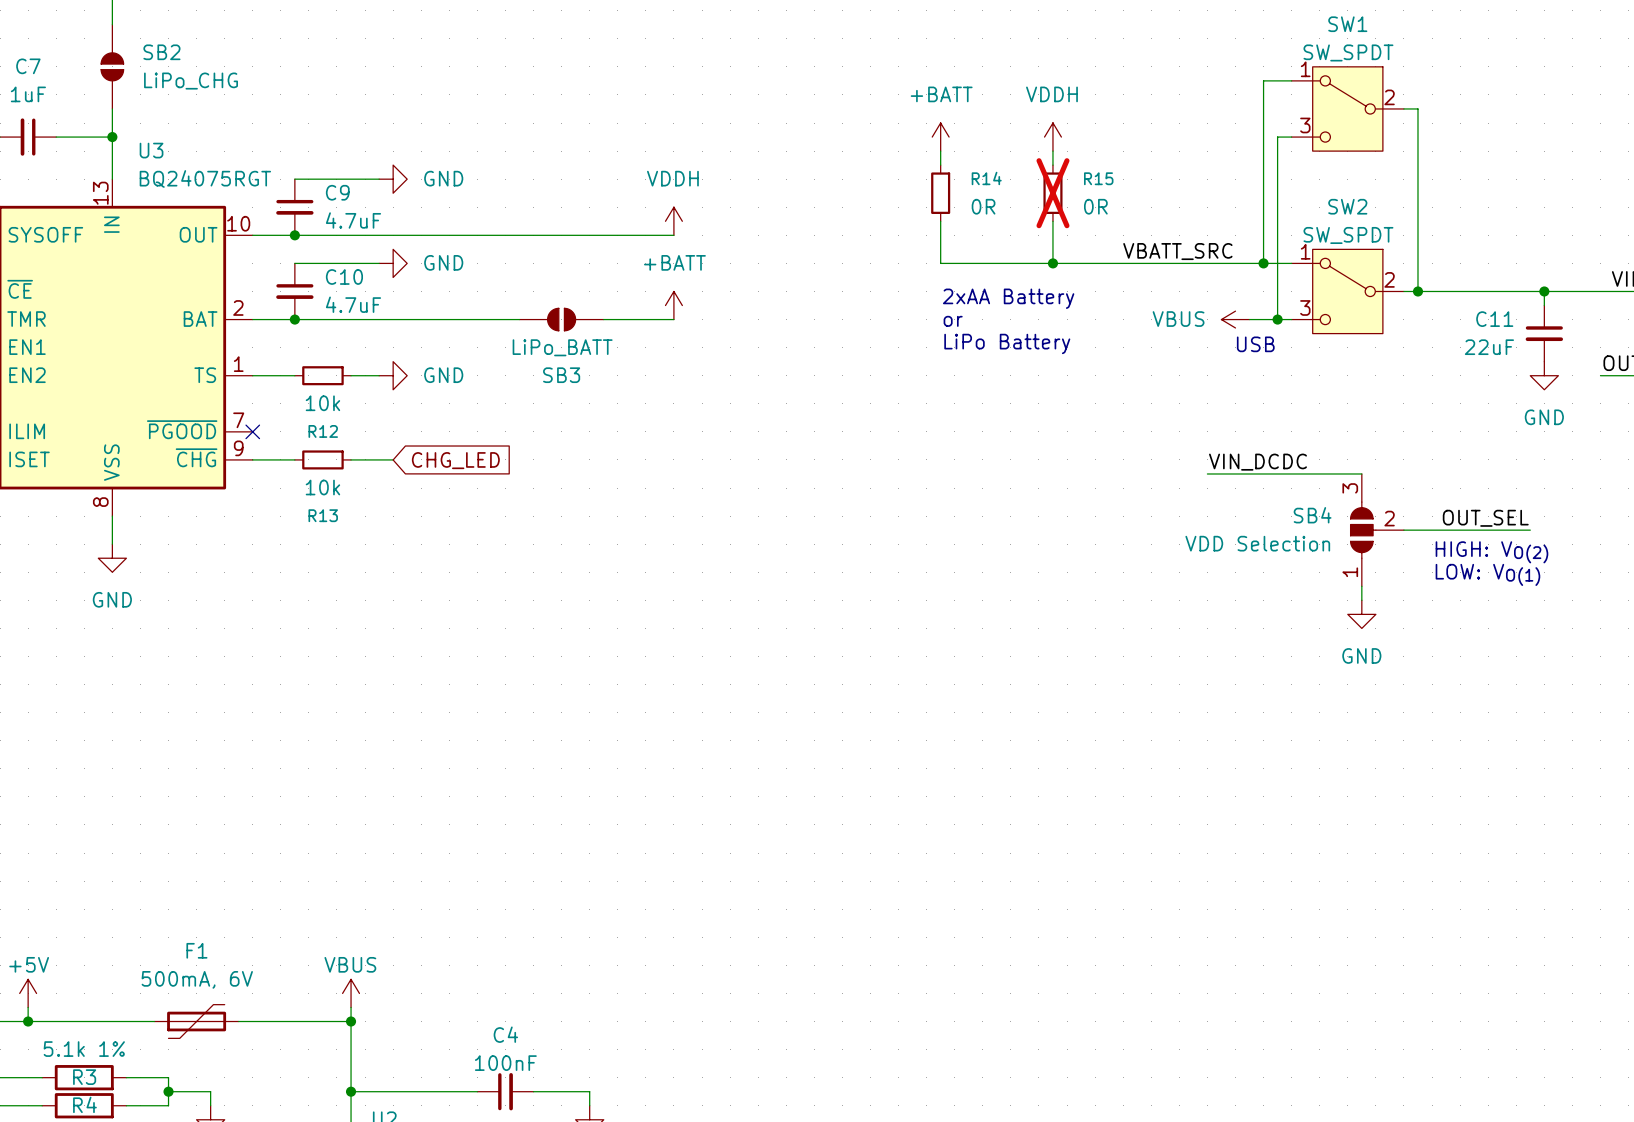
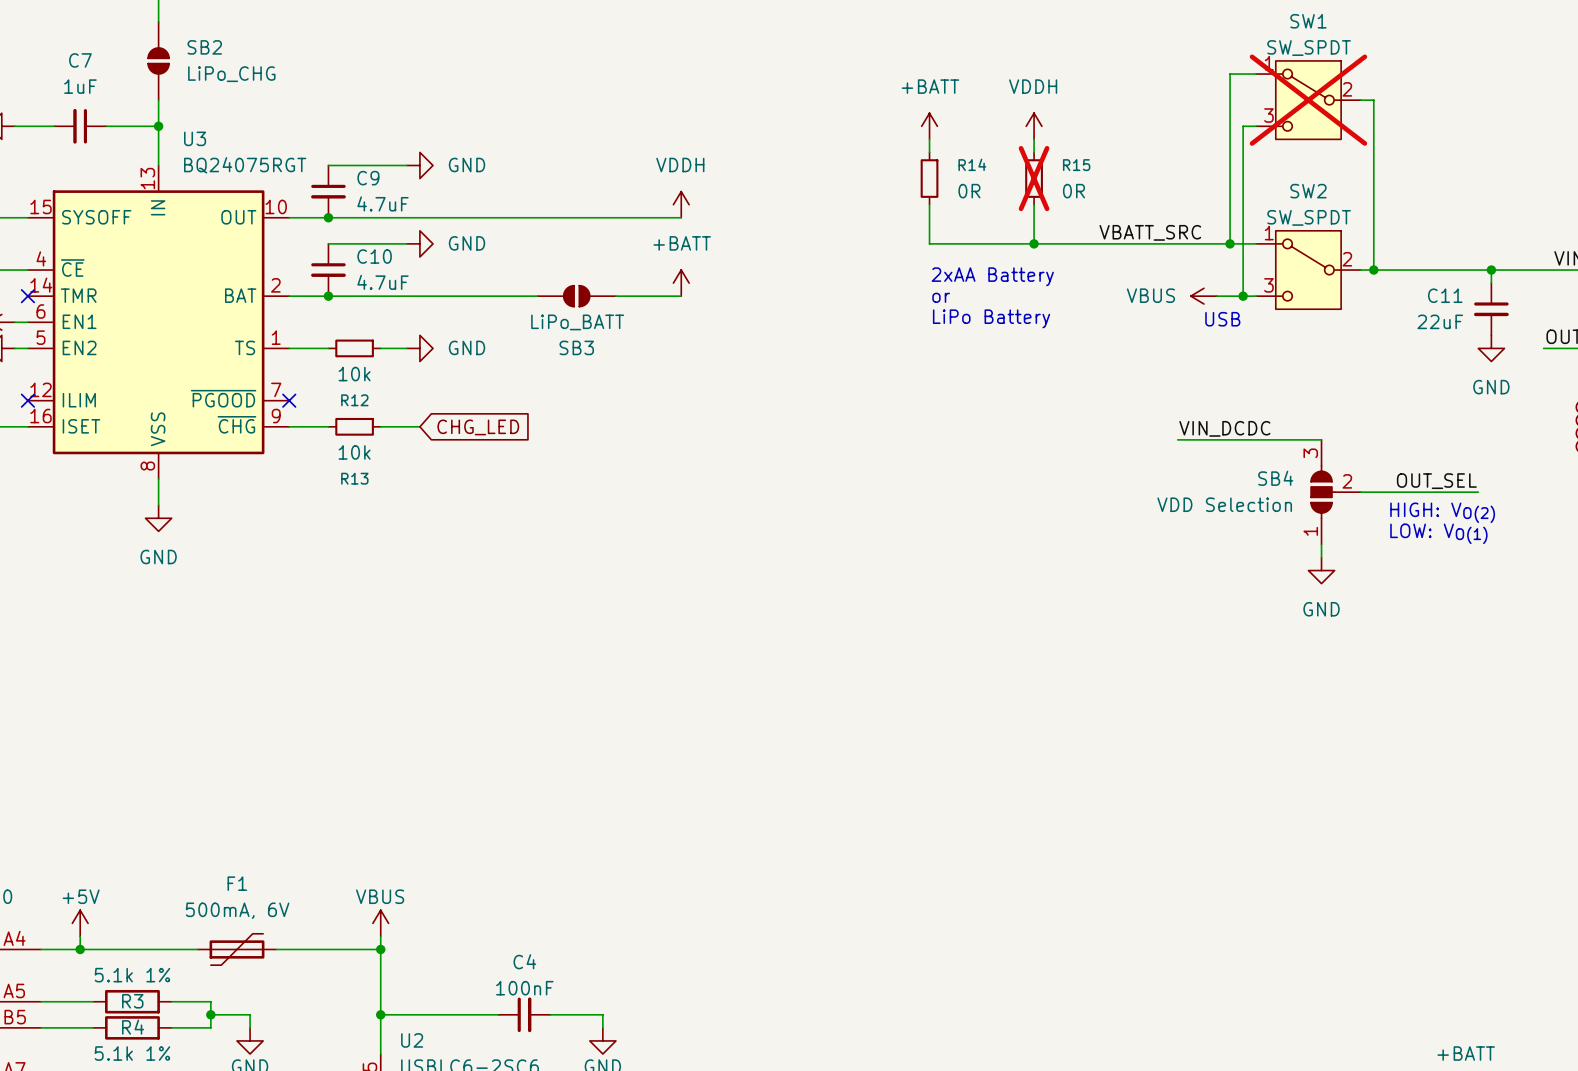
SW1 do-not-place cross: none -> (1308, 100)

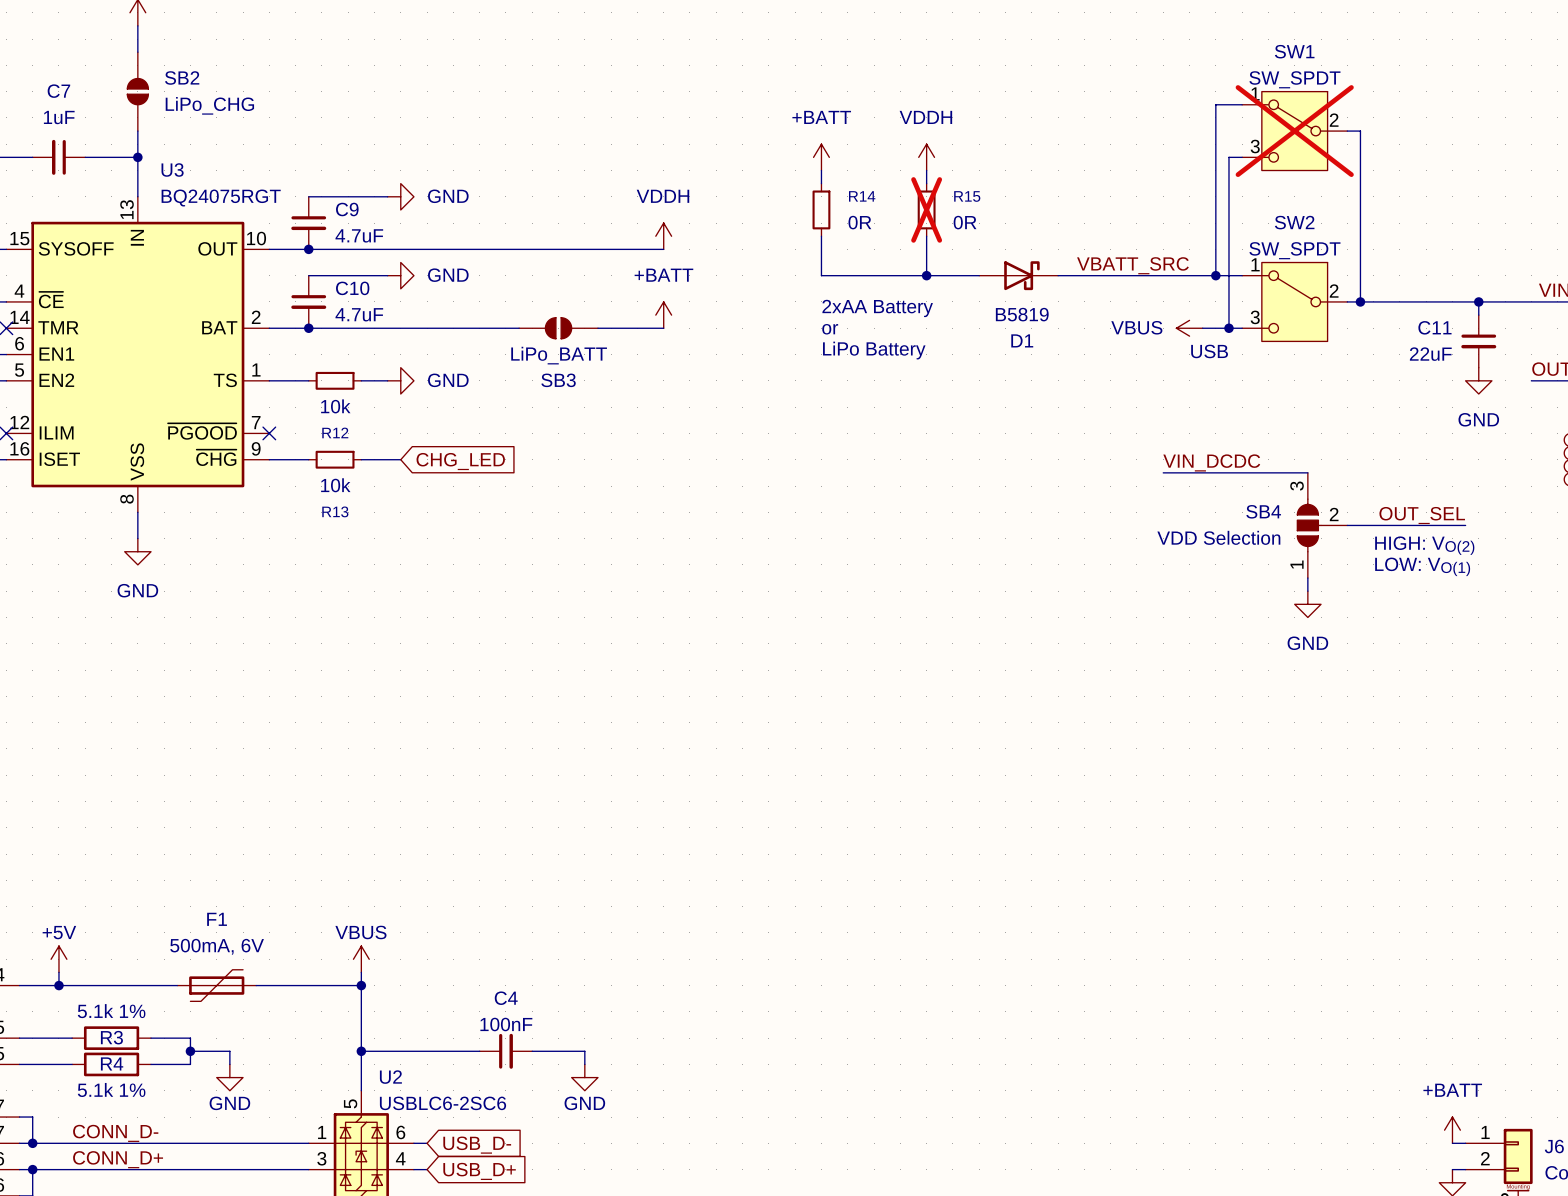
power symbol position: +BATT (929, 126) -> +BATT (821, 157)
power symbol position: VDDH (1034, 126) -> VDDH (926, 157)
wire: (929, 139) (929, 152) -> (821, 170) (821, 183)
wire: (1034, 139) (1034, 152) -> (926, 170) (926, 183)
R14 position: (929, 178) -> (821, 209)
R15 position: (1034, 178) -> (926, 209)
wire: (929, 204) (929, 243) -> (821, 236) (821, 275) (913, 275)
wire: (1034, 204) (1034, 243) -> (926, 236) (926, 275)
junction: none -> (926, 275)
junction: (1034, 243) -> none
D1: none -> B5819 (1018, 275)
text position: 2xAA Battery (992, 276) -> 2xAA Battery (877, 308)
text position: or (941, 297) -> or (830, 329)
text position: LiPo Battery (991, 318) -> LiPo Battery (874, 350)

